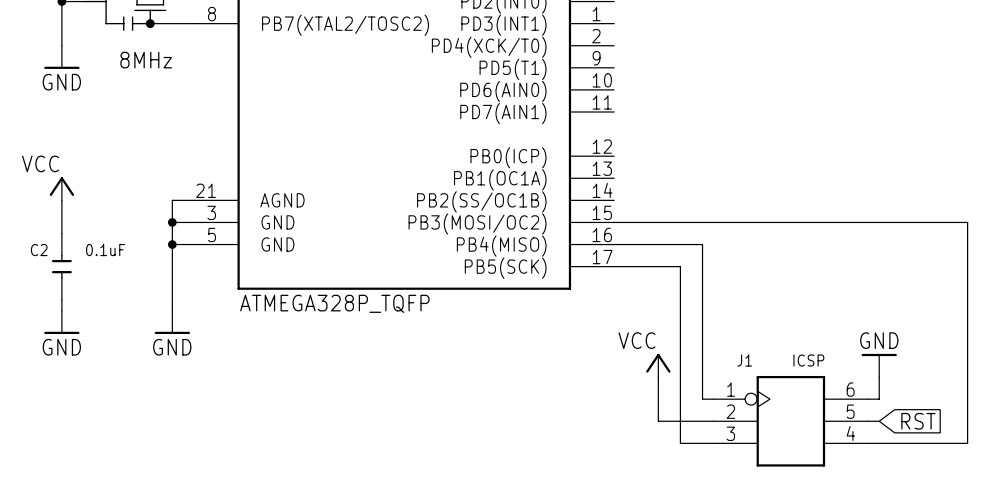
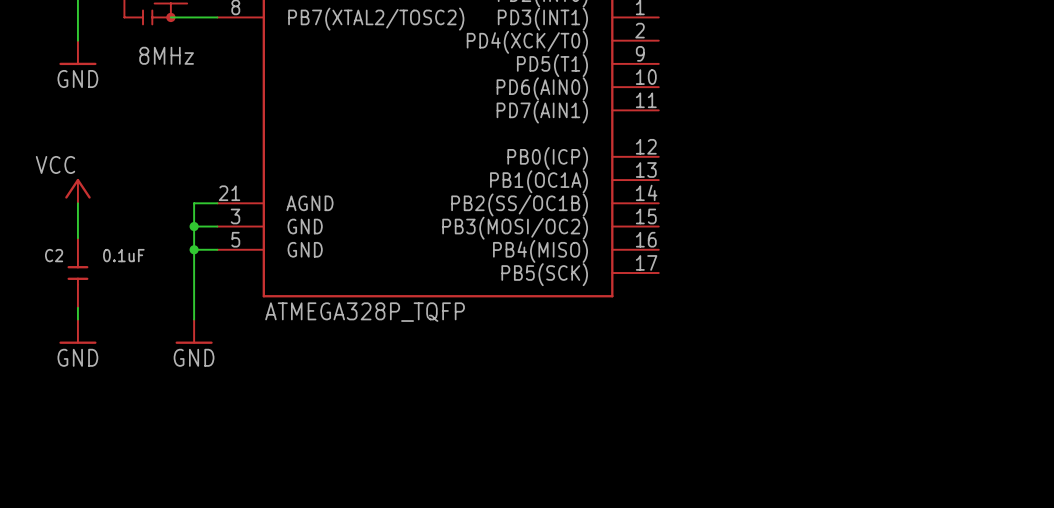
wire: (614, 222) (967, 222) (967, 443) (868, 443) -> none
wire: (614, 244) (702, 244) (702, 399) (713, 399) -> none
wire: (614, 266) (680, 266) (680, 443) (713, 443) -> none
power symbol: VCC (658, 365) -> none
power symbol: GND (879, 365) -> none
wire: (658, 377) (658, 421) (713, 421) -> none
wire: (879, 377) (879, 399) (868, 399) -> none
J1: ICSP (790, 421) -> none
wire: (868, 421) (879, 421) -> none
global label: RST (918, 421) -> none

